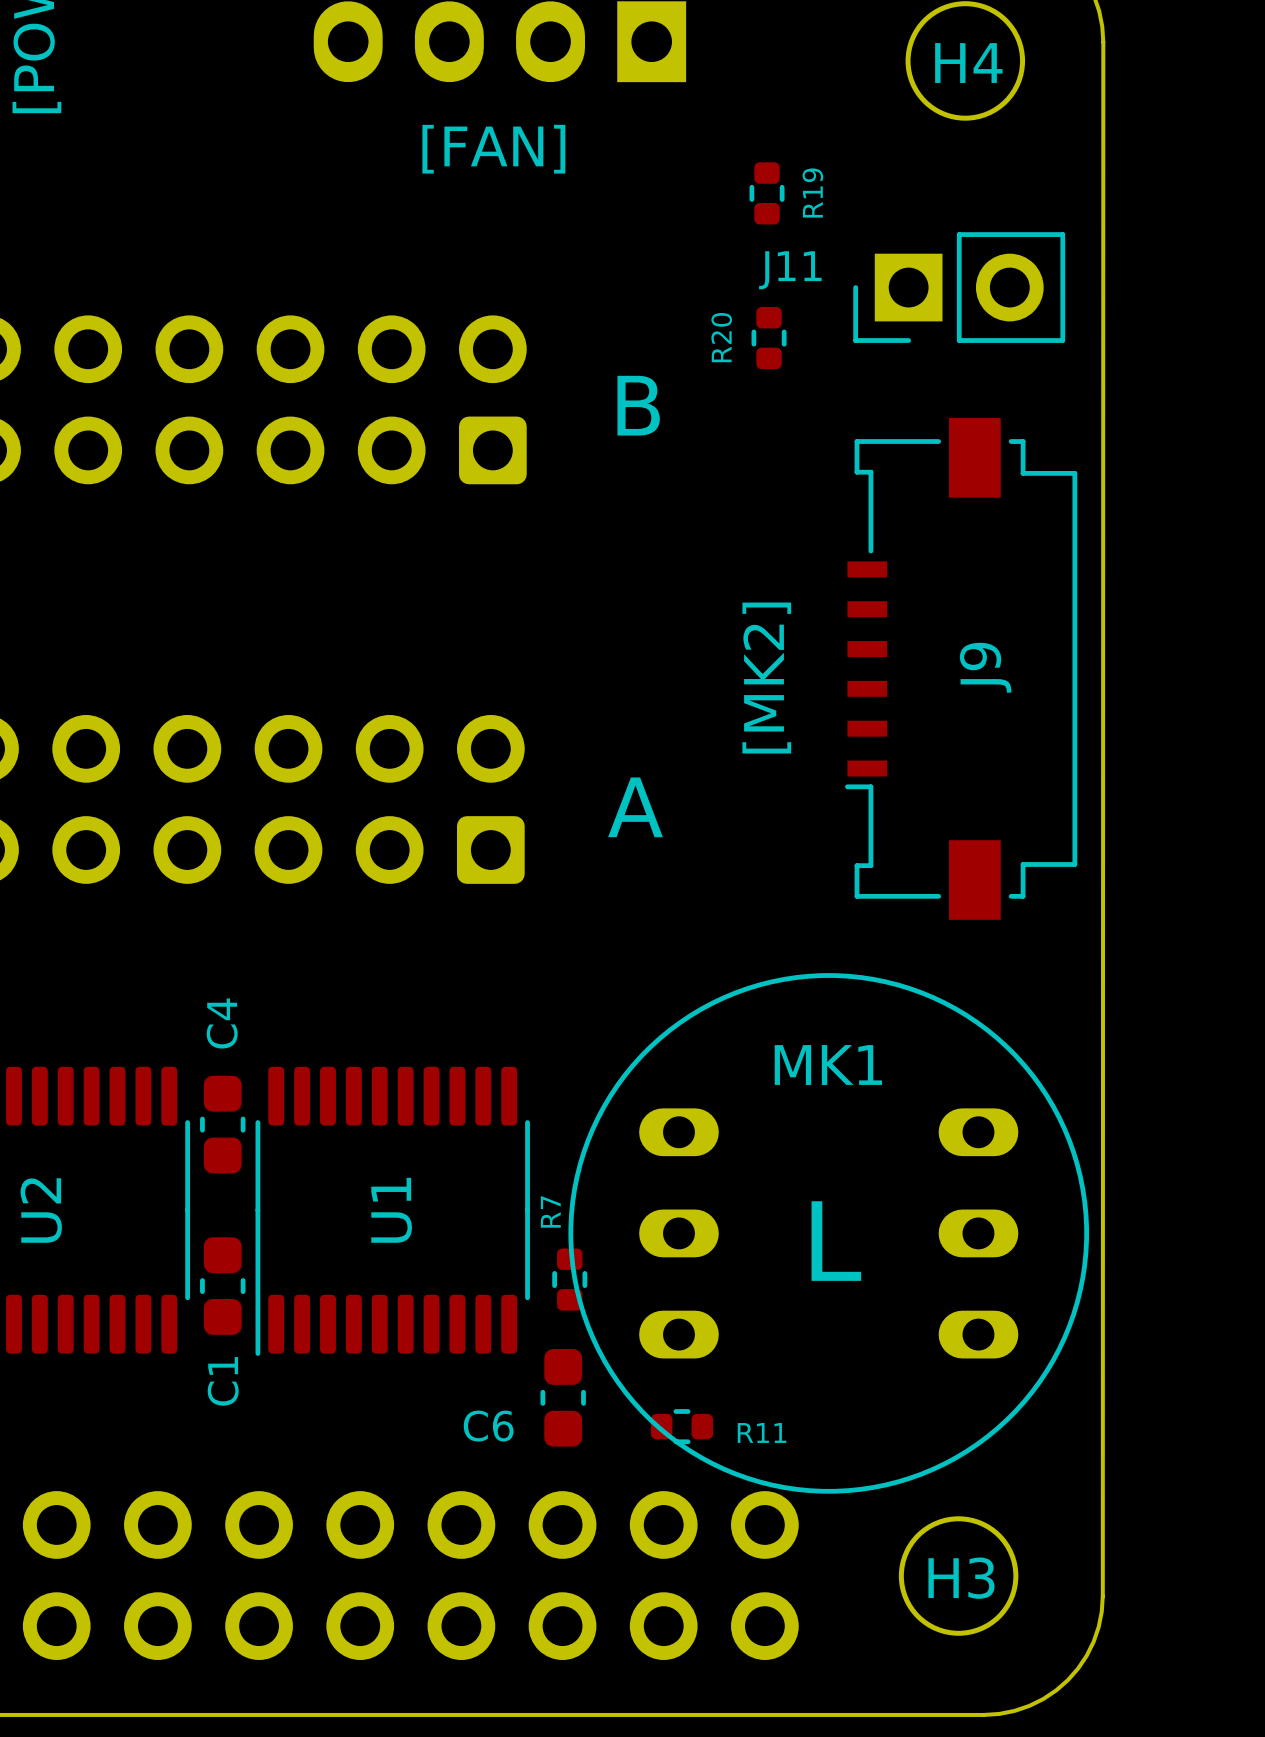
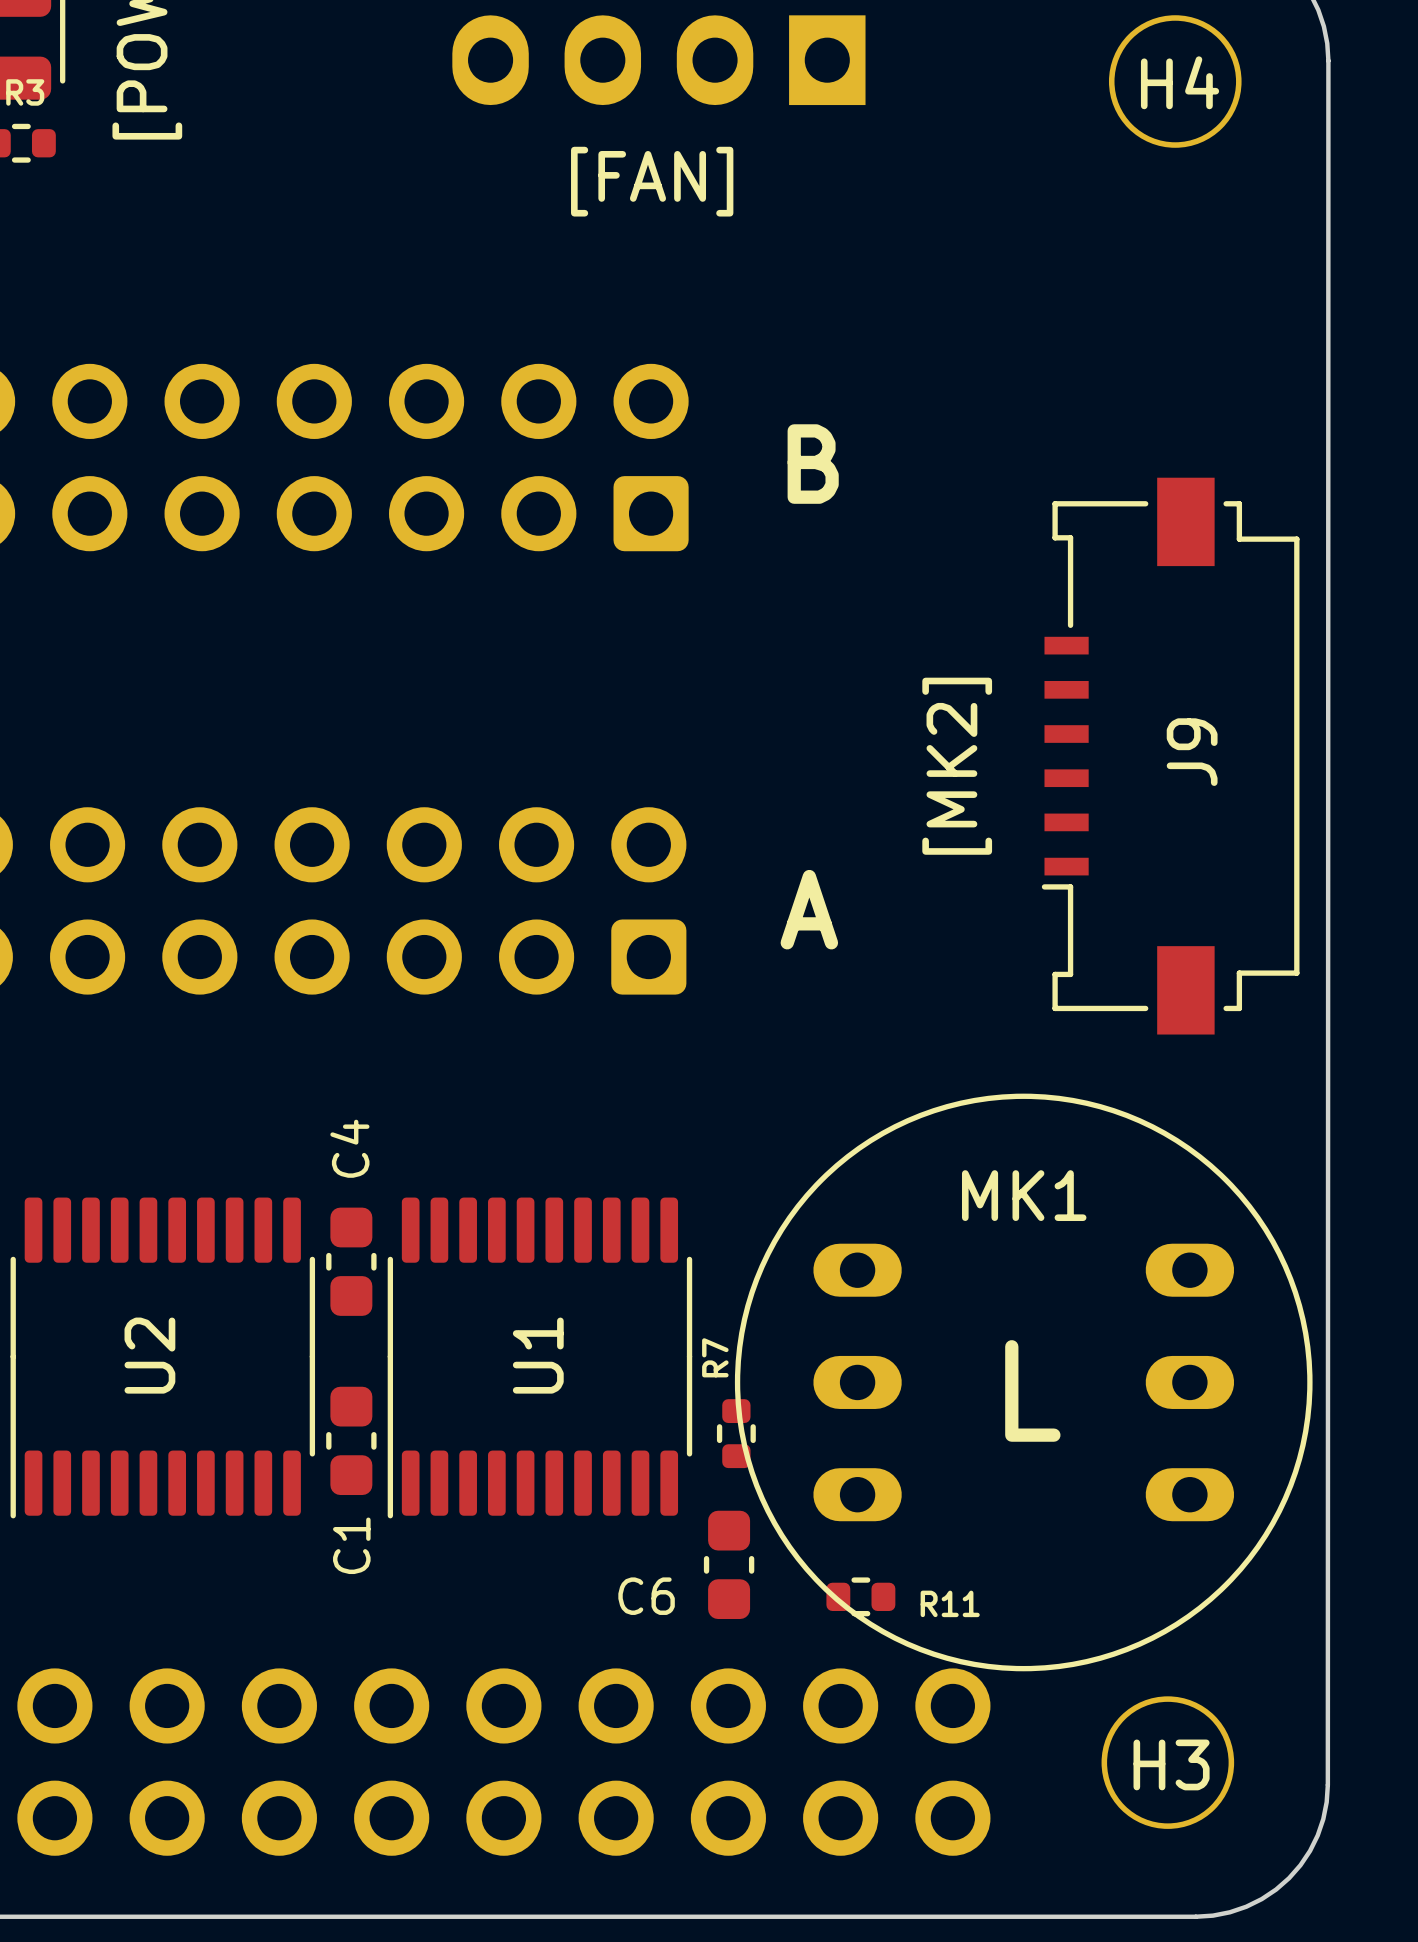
R19: (767, 193) -> none
J11: (959, 287) -> none
R20: (769, 338) -> none

